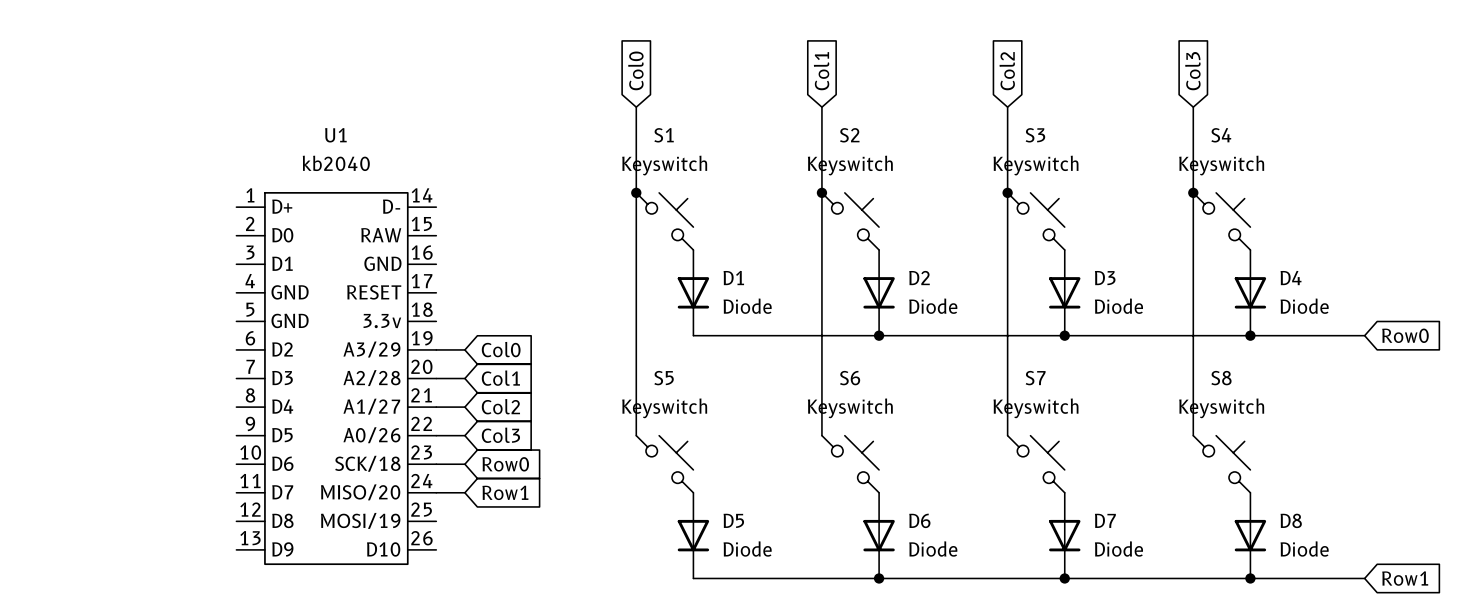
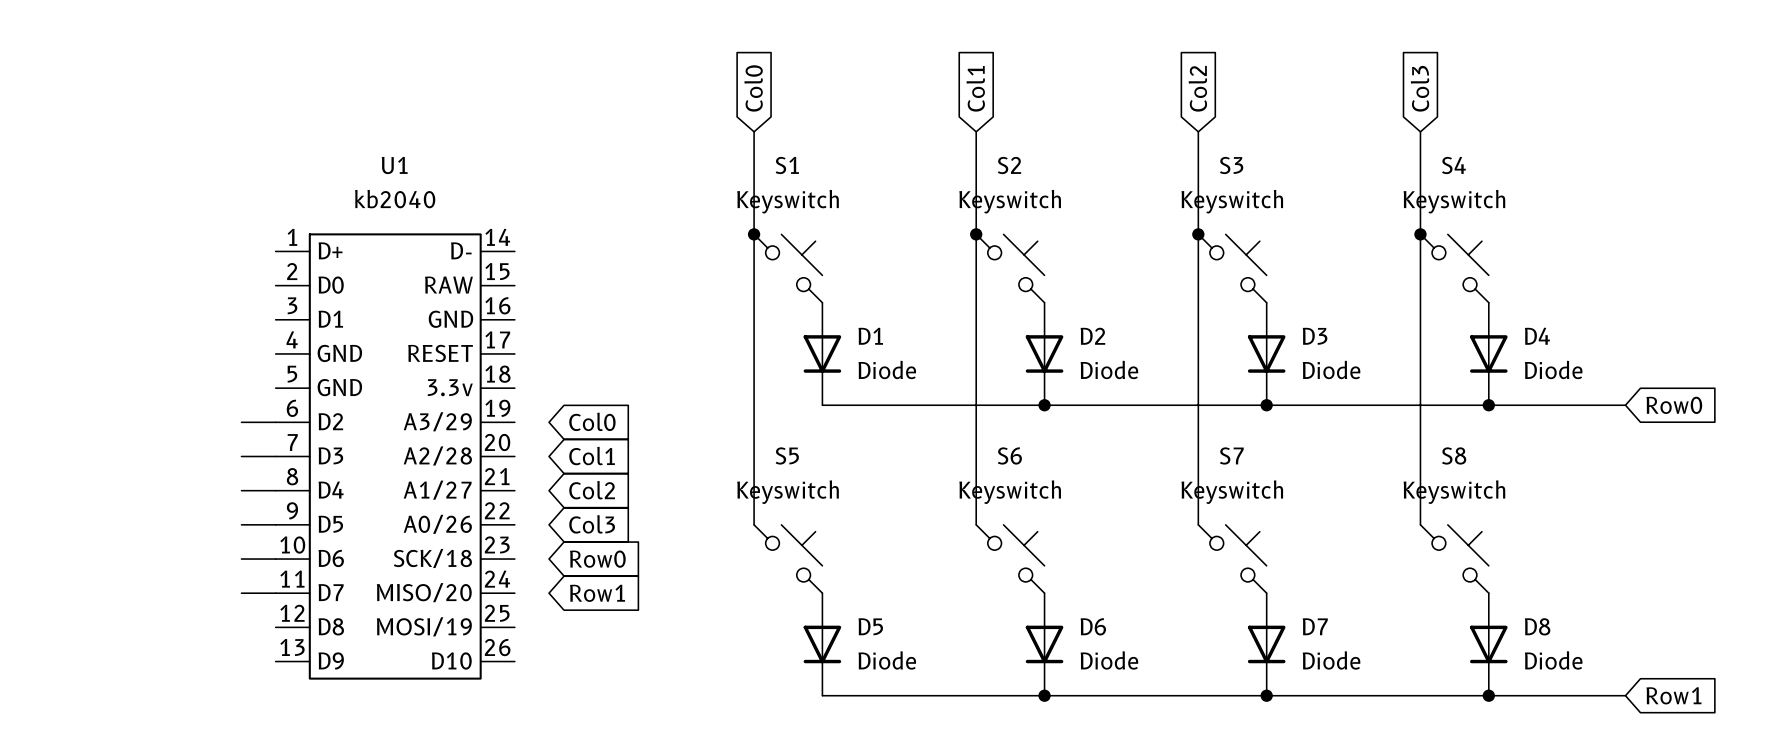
wire: (436, 349) (464, 349) -> (241, 422) (275, 422)
wire: (436, 378) (464, 378) -> (241, 456) (275, 456)
wire: (436, 407) (464, 407) -> (241, 490) (275, 490)
wire: (436, 435) (464, 435) -> (241, 524) (275, 524)
wire: (436, 464) (464, 464) -> (241, 559) (275, 559)
wire: (436, 492) (464, 492) -> (241, 593) (275, 593)

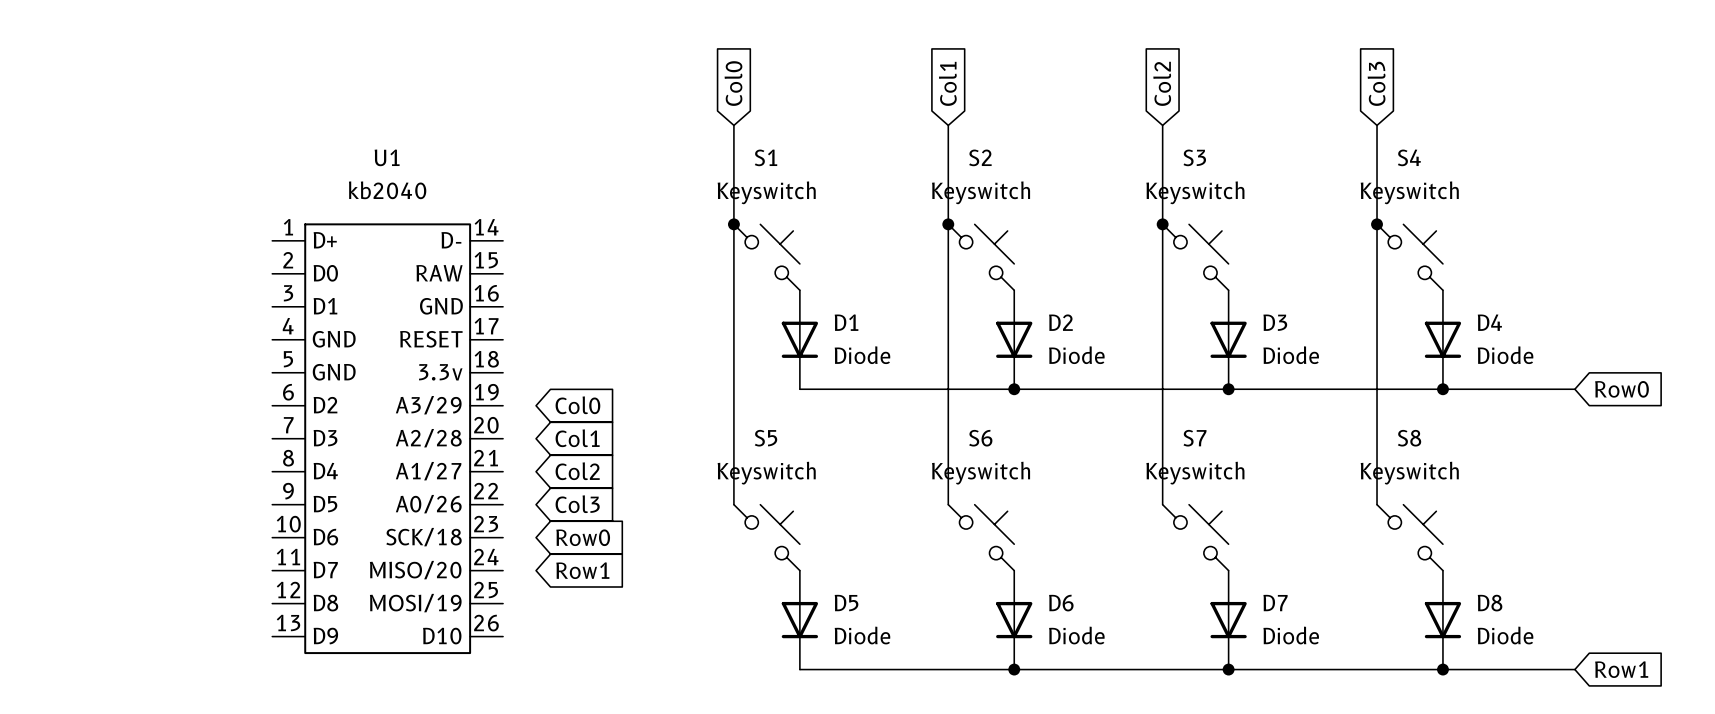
wire: (241, 422) (275, 422) -> none
wire: (241, 456) (275, 456) -> none
wire: (241, 490) (275, 490) -> none
wire: (241, 524) (275, 524) -> none
wire: (241, 559) (275, 559) -> none
wire: (241, 593) (275, 593) -> none

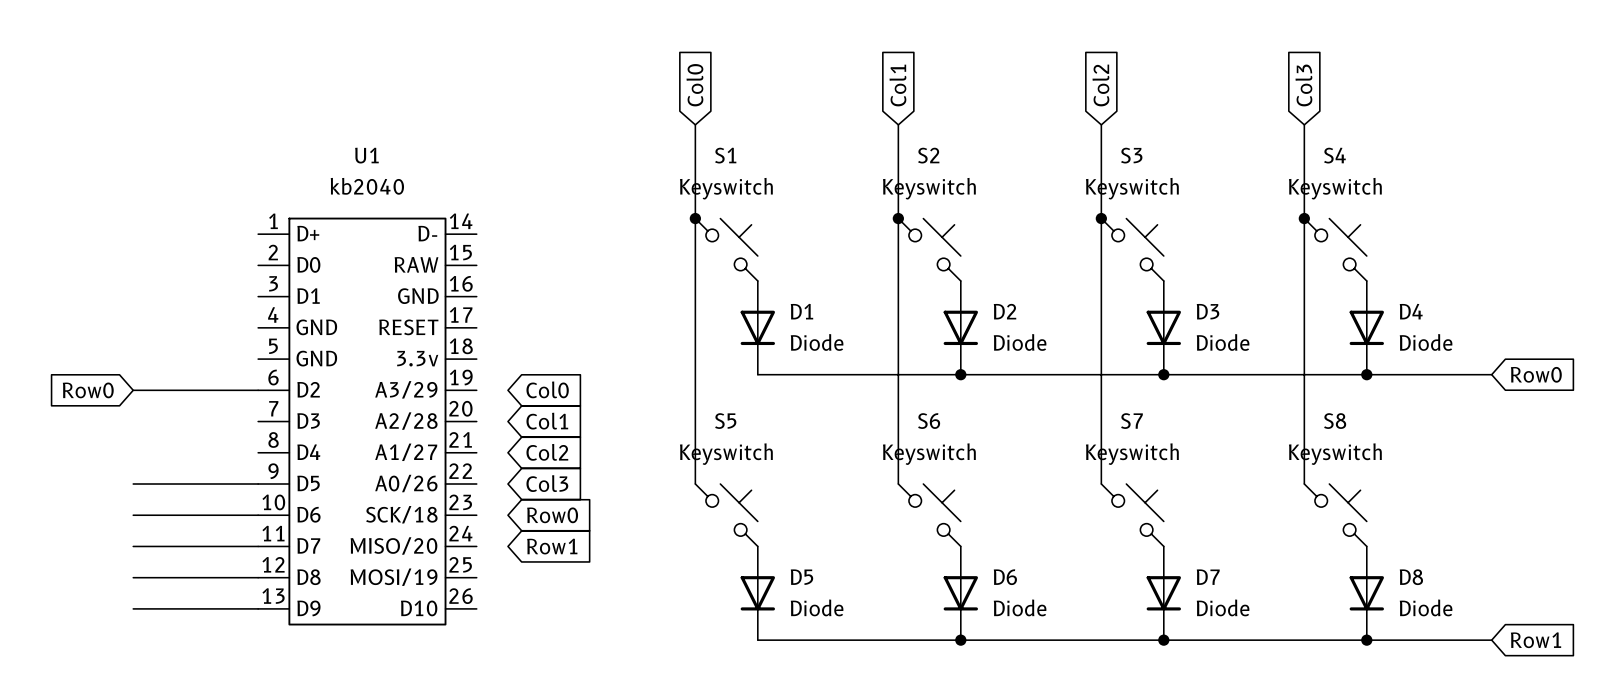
global label: none -> Row0 (88, 390)
wire: none -> (133, 390) (258, 390)
wire: none -> (133, 484) (258, 484)
wire: none -> (133, 515) (258, 515)
wire: none -> (133, 546) (258, 546)
wire: none -> (133, 577) (258, 577)
wire: none -> (133, 608) (258, 608)

